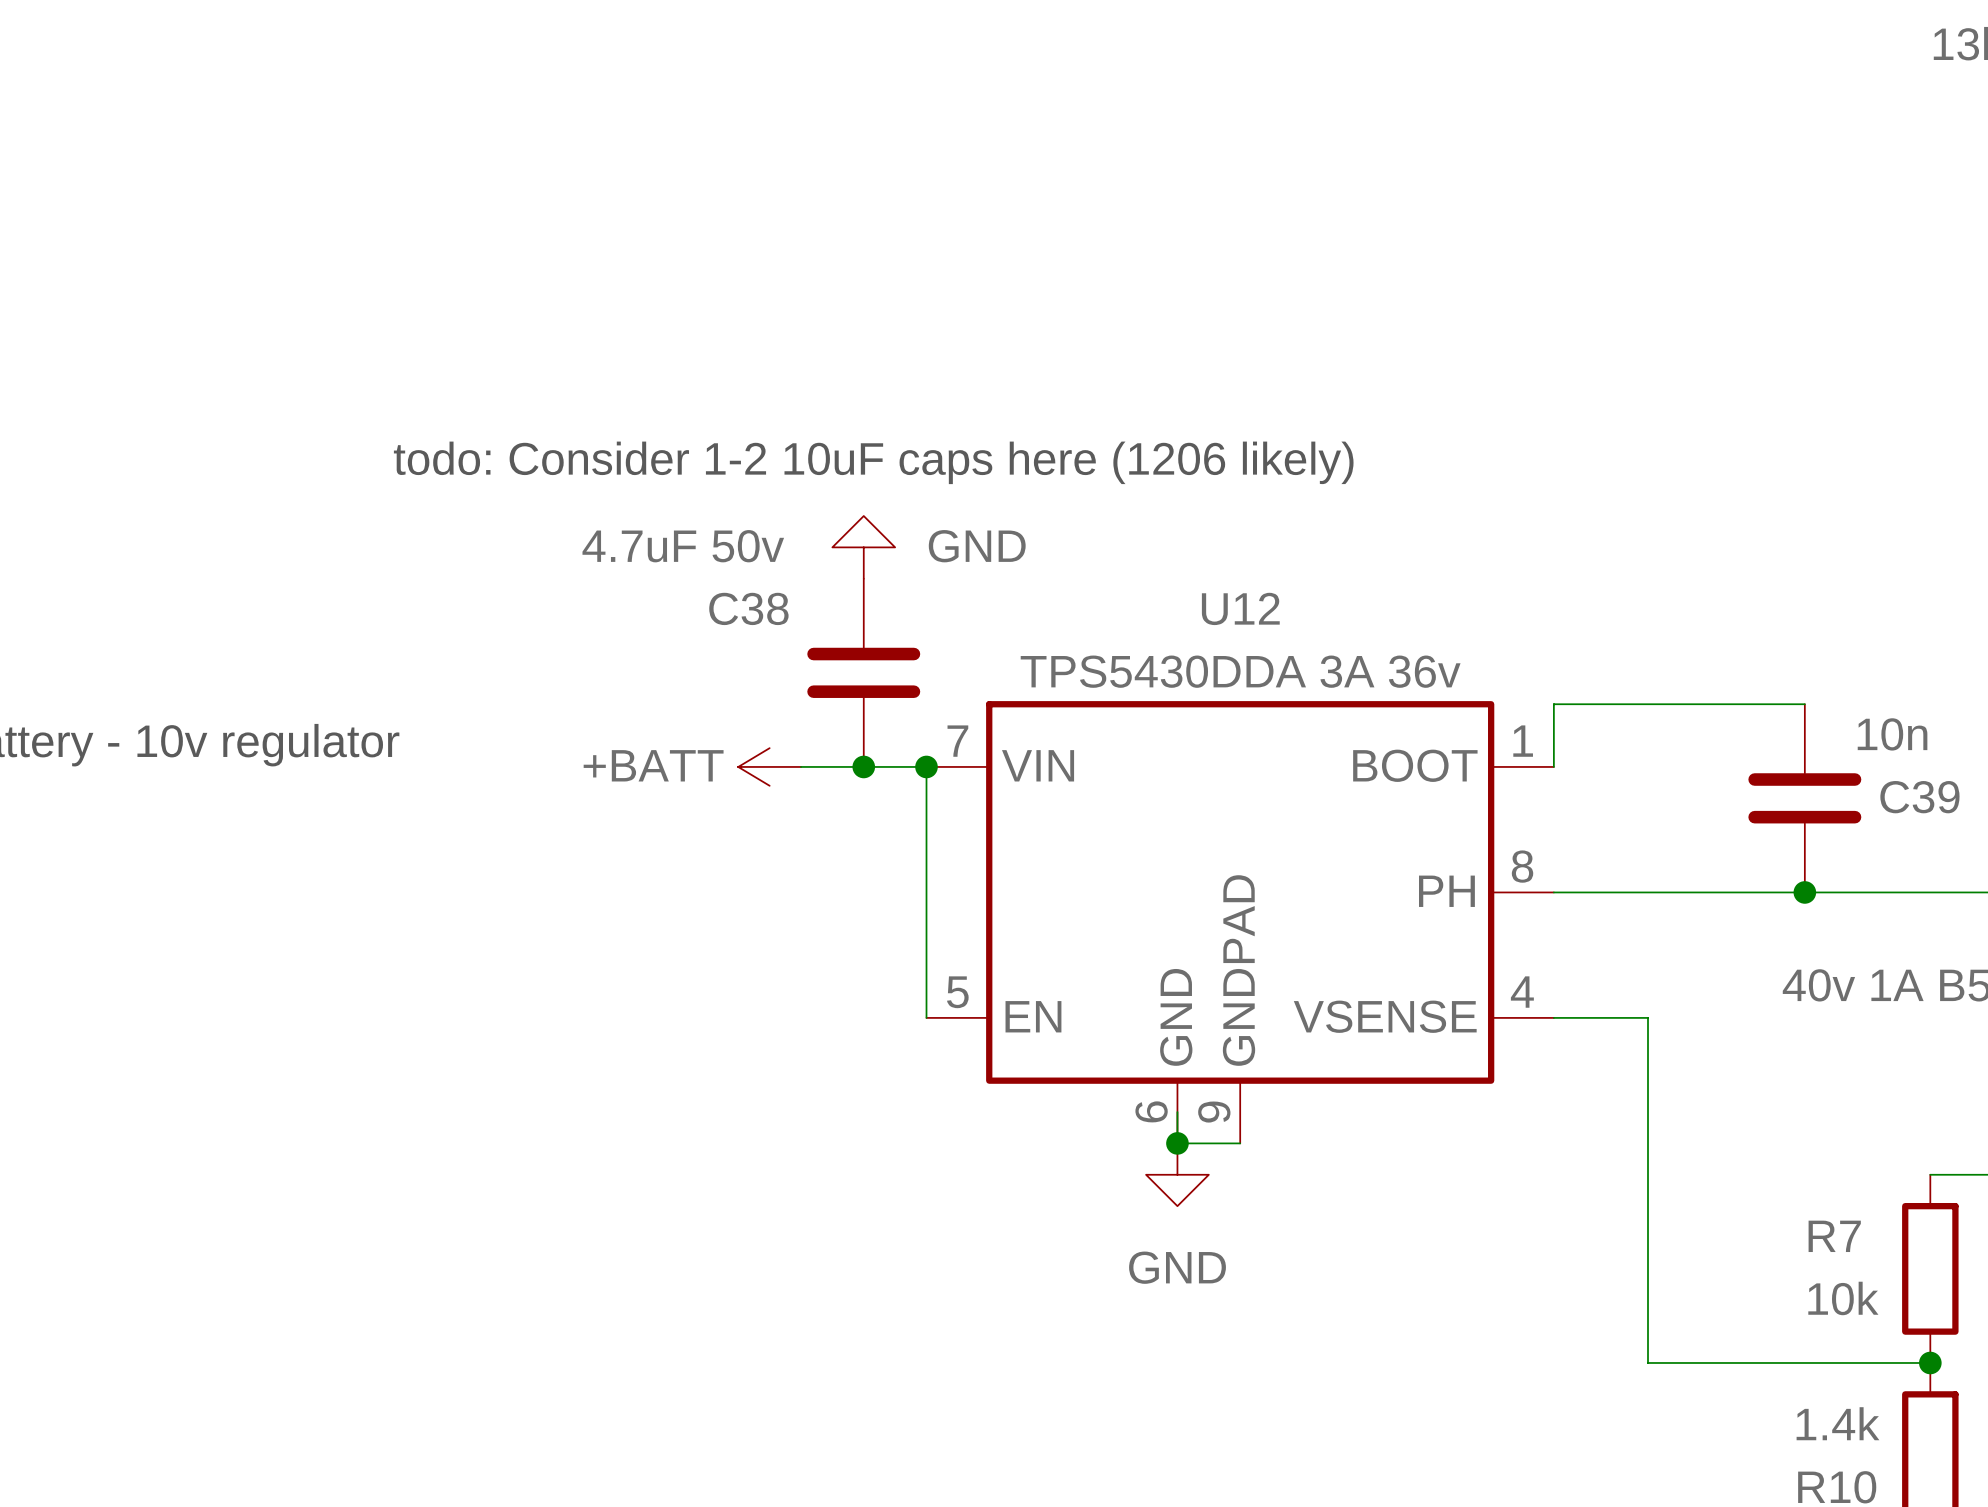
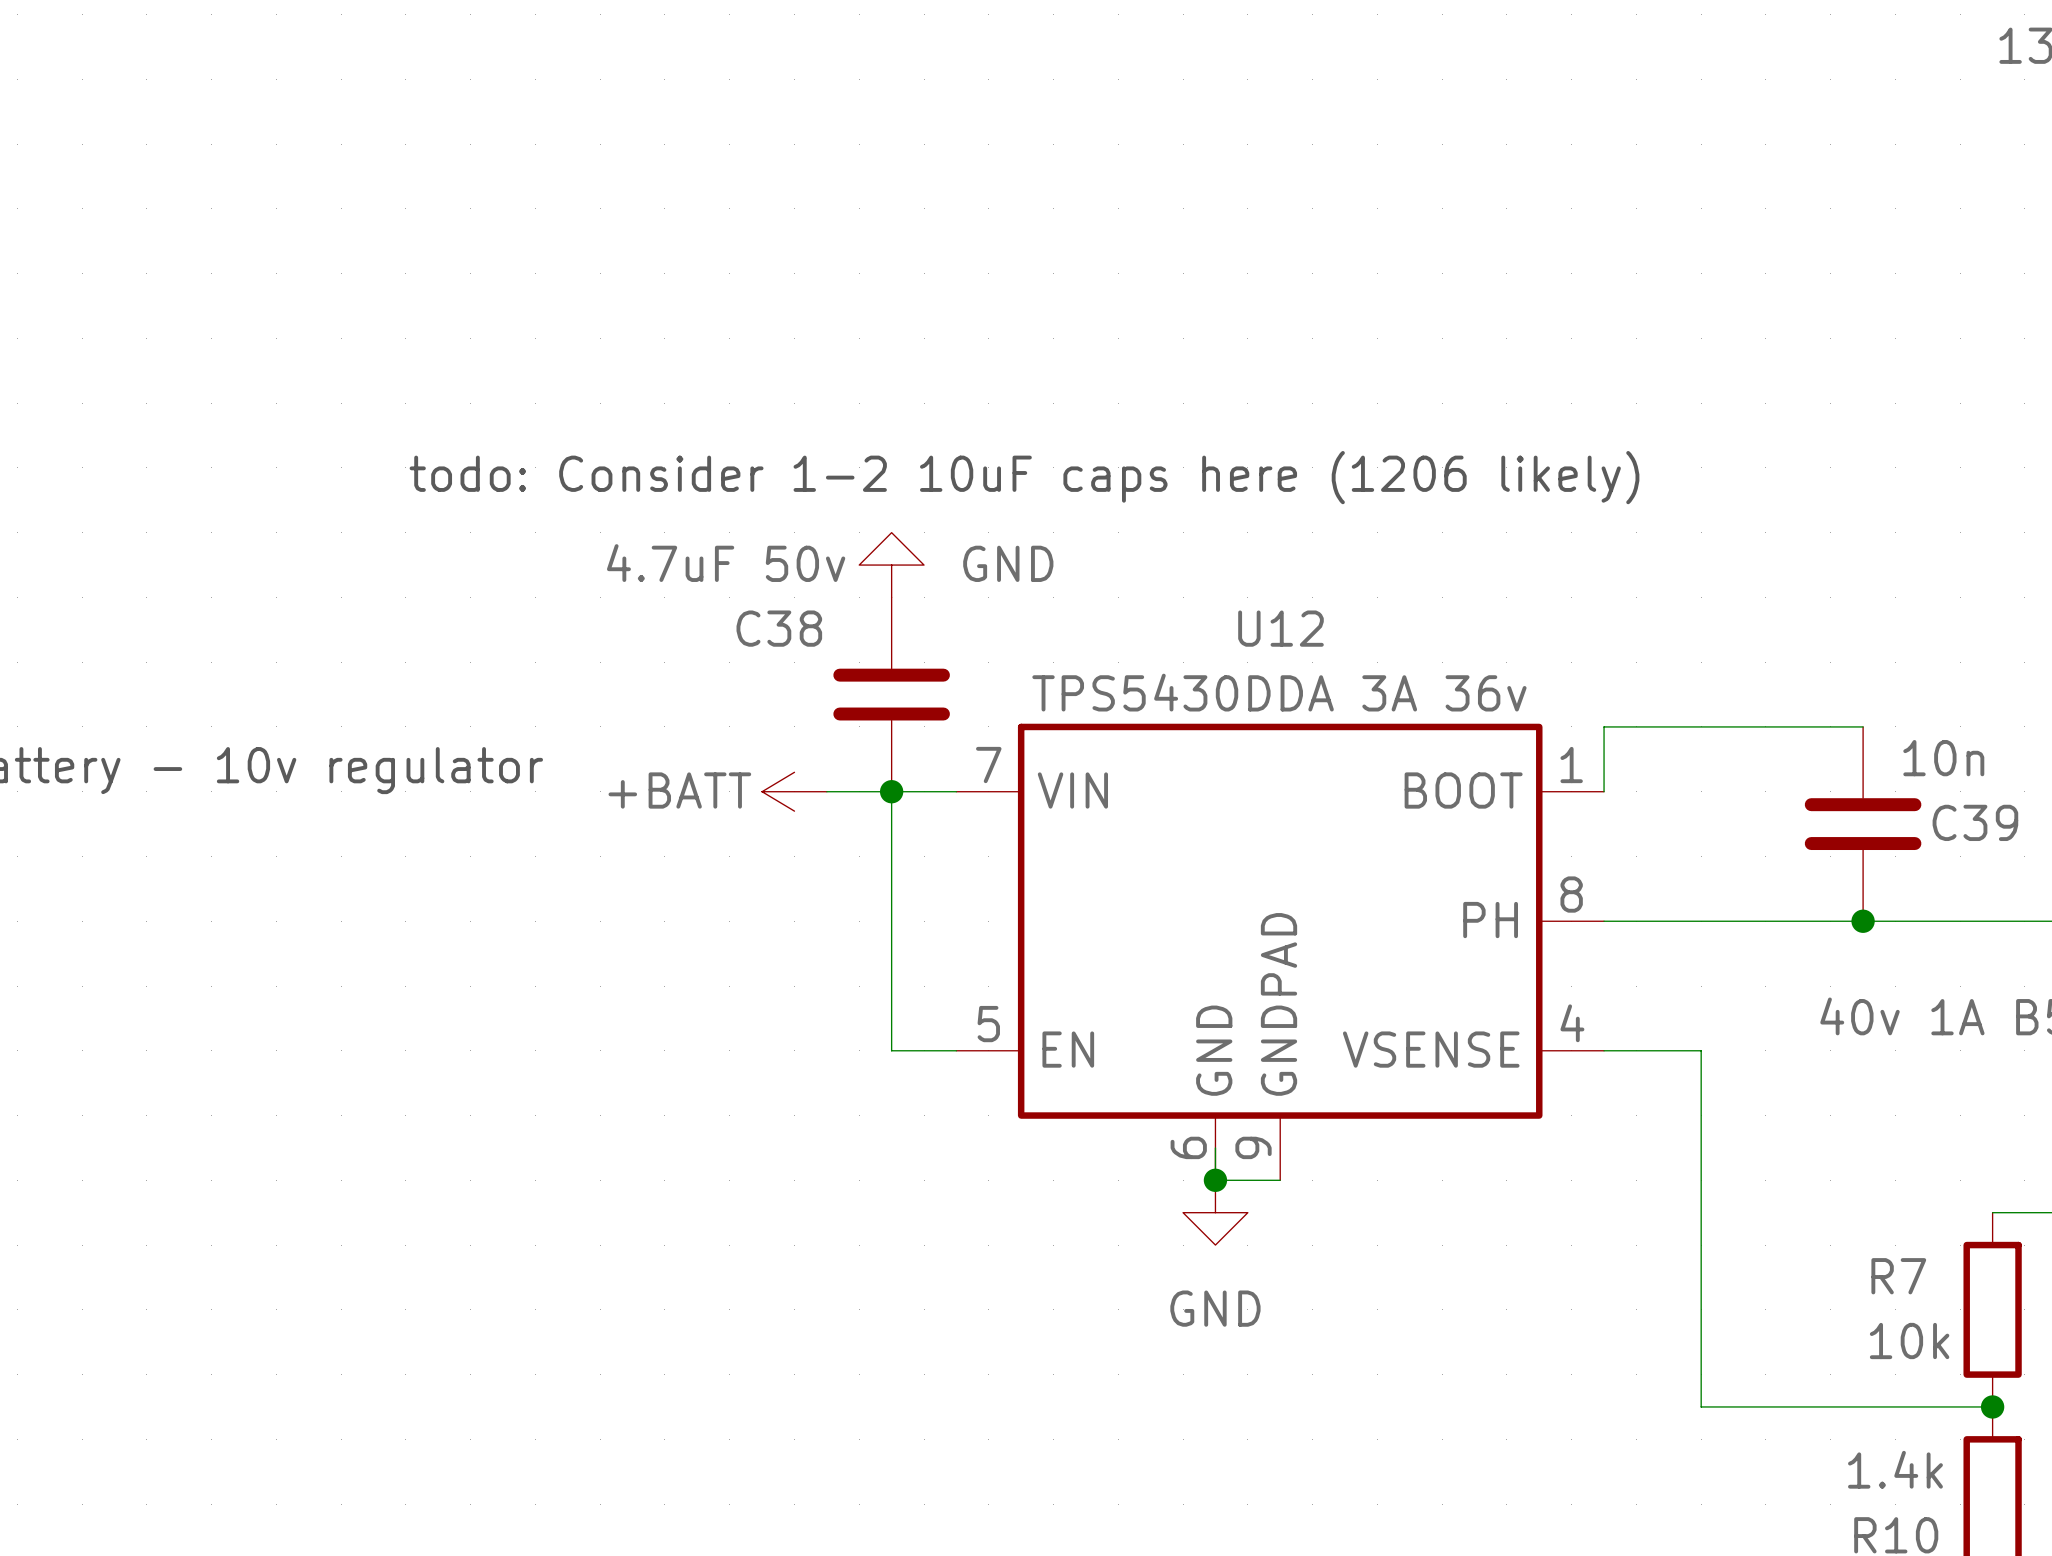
wire: (926, 766) (926, 1017) -> (891, 791) (891, 1050) (956, 1050)
junction: (926, 766) -> none

